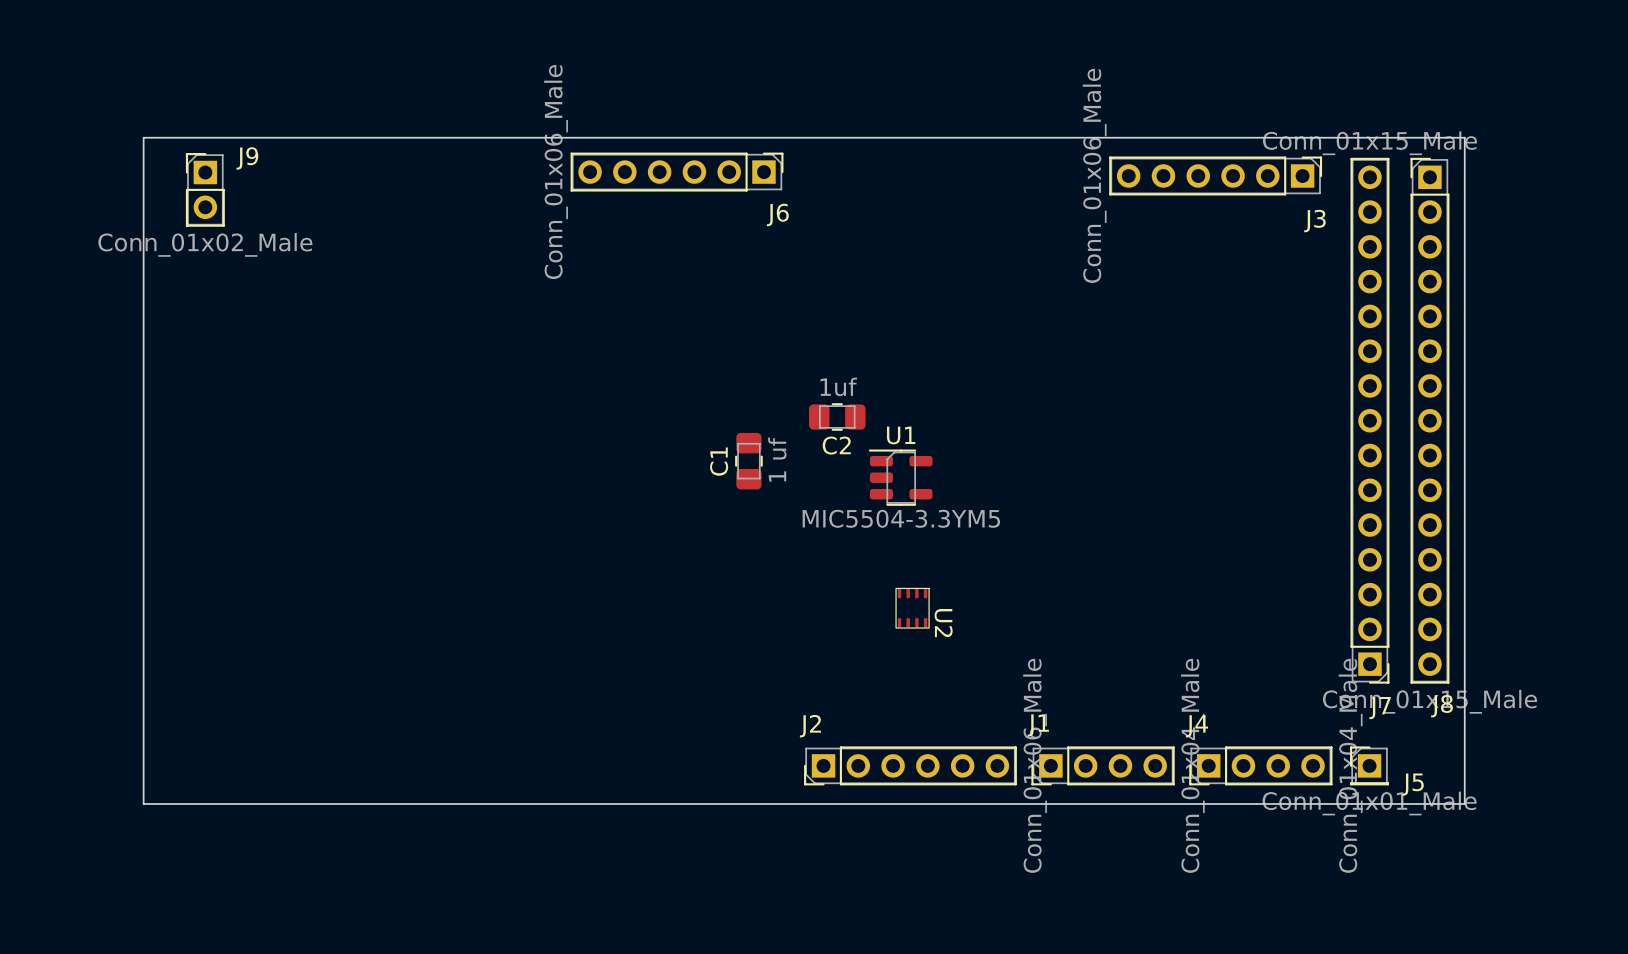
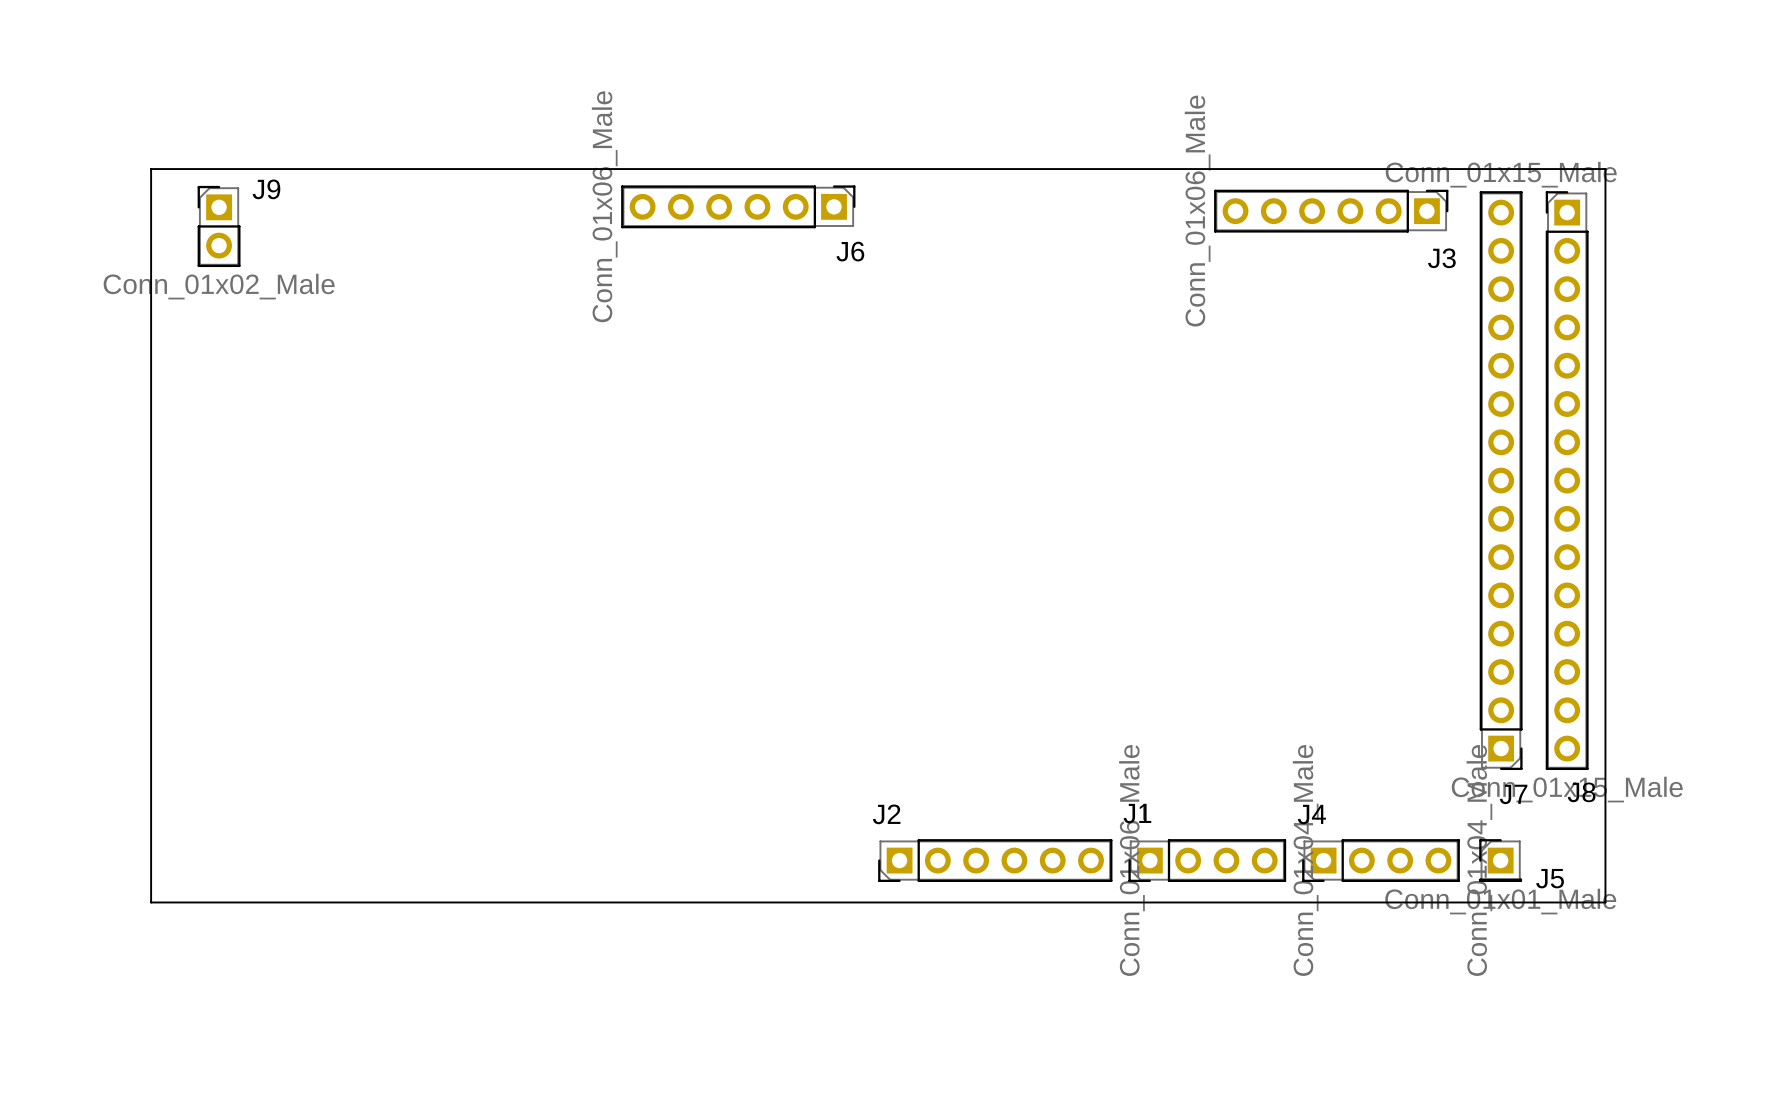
C2: 1uf (837, 416) -> none
C1: 1 uf (748, 461) -> none
U1: MIC5504-3.3YM5 (900, 477) -> none
U2: (912, 608) -> none

